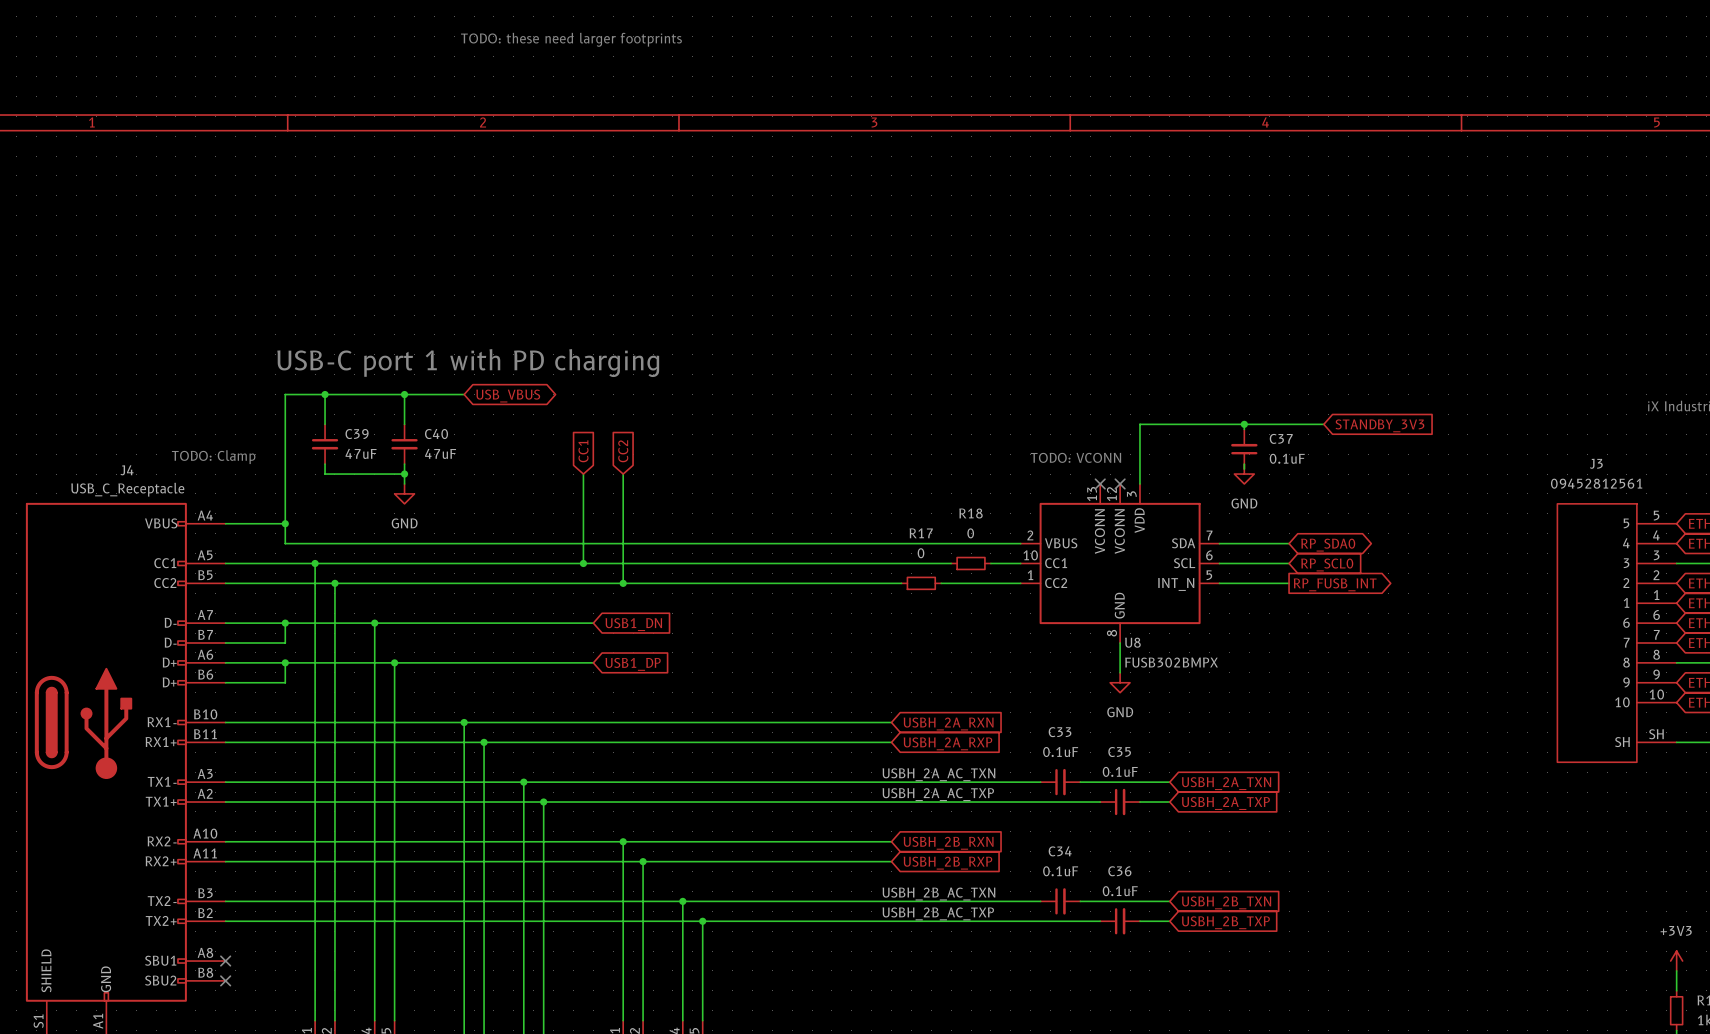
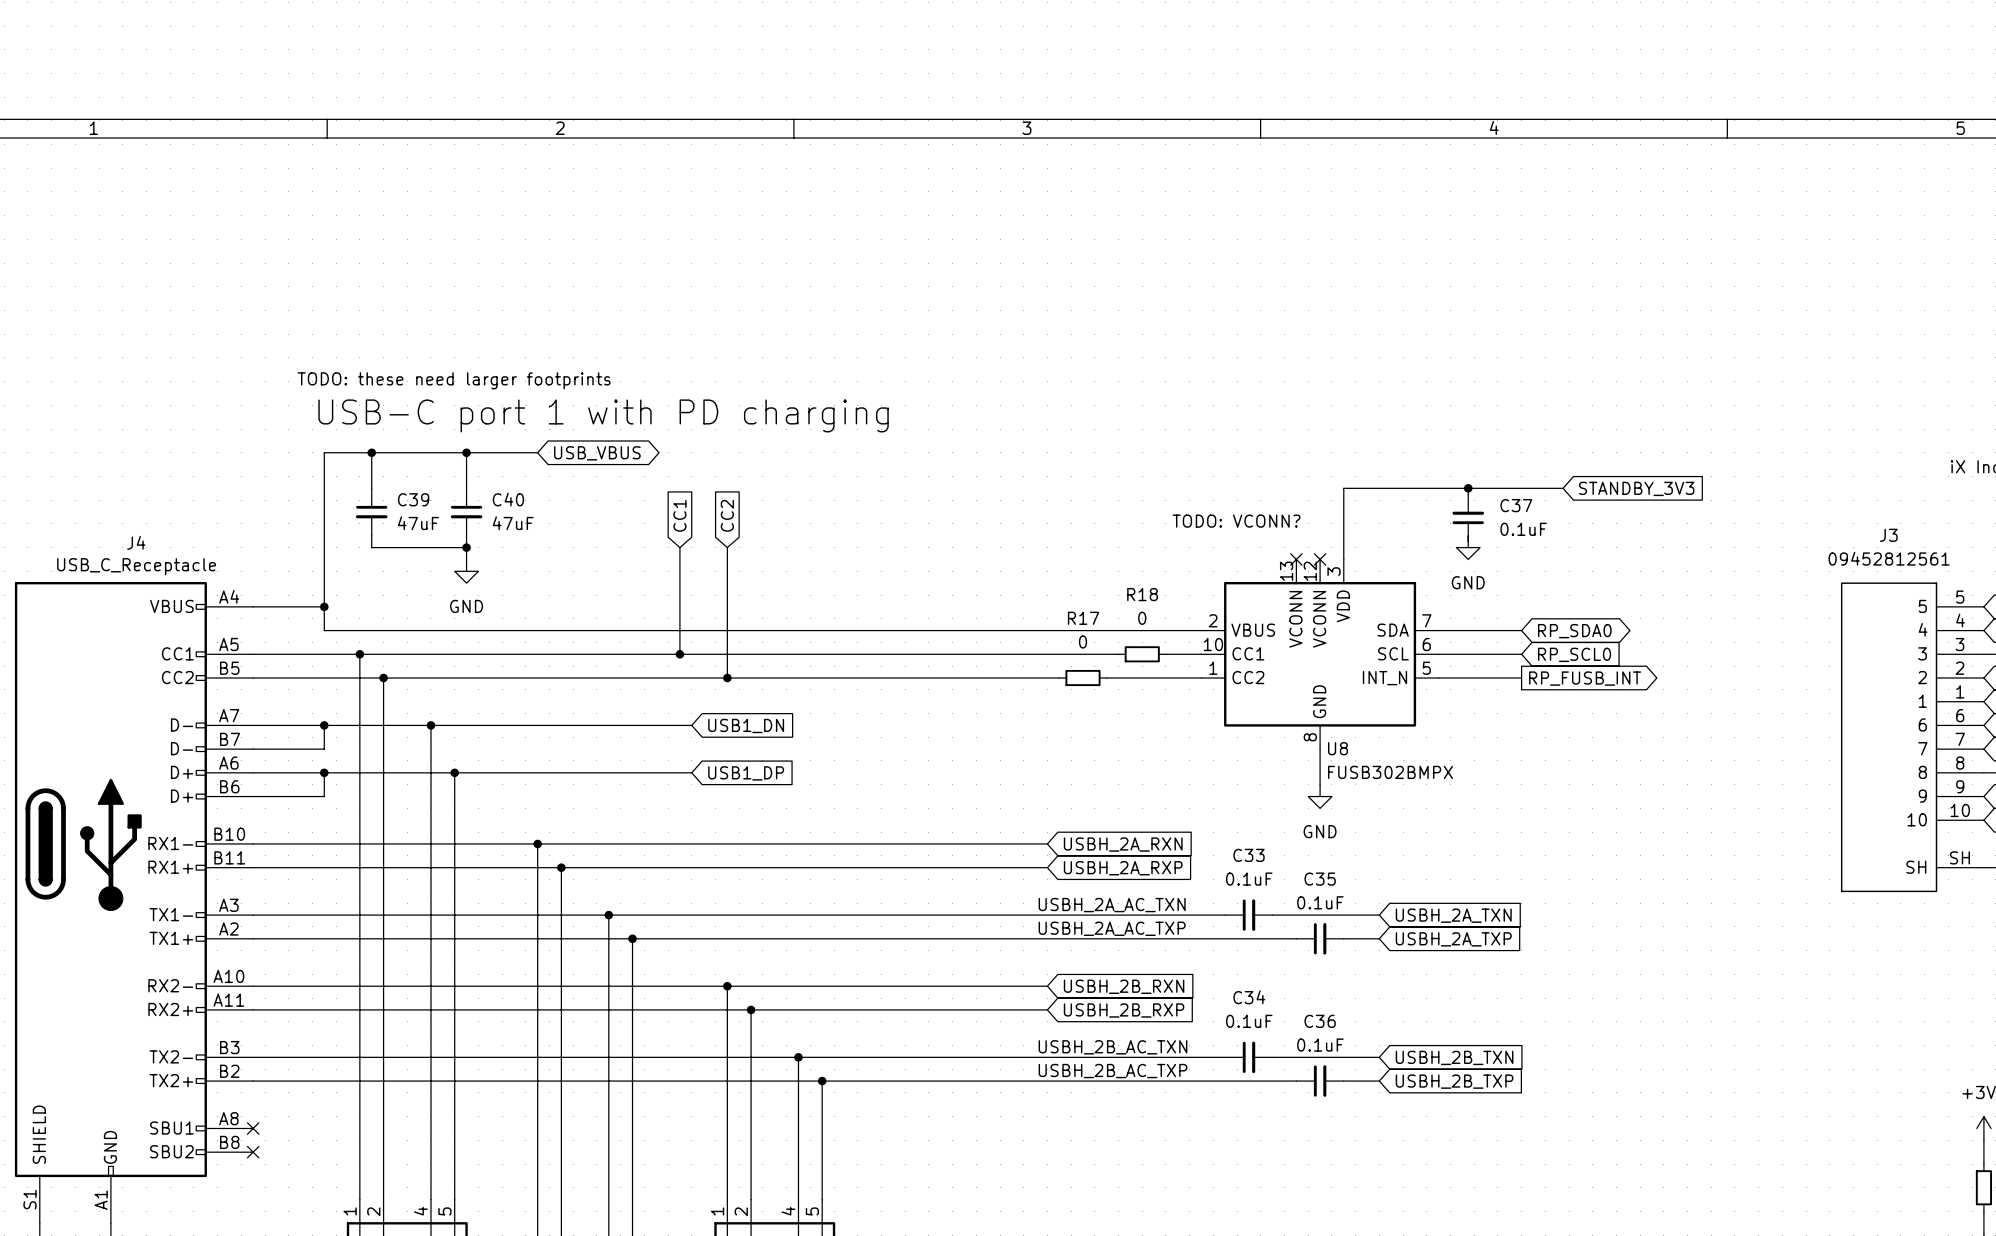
text: TODO: these need larger footprints (571, 39) -> none
text: none -> TODO: these need larger footprints (454, 380)
text: TODO: Clamp (213, 457) -> none
text: TODO: VCONN (1075, 457) -> TODO: VCONN? (1236, 521)

